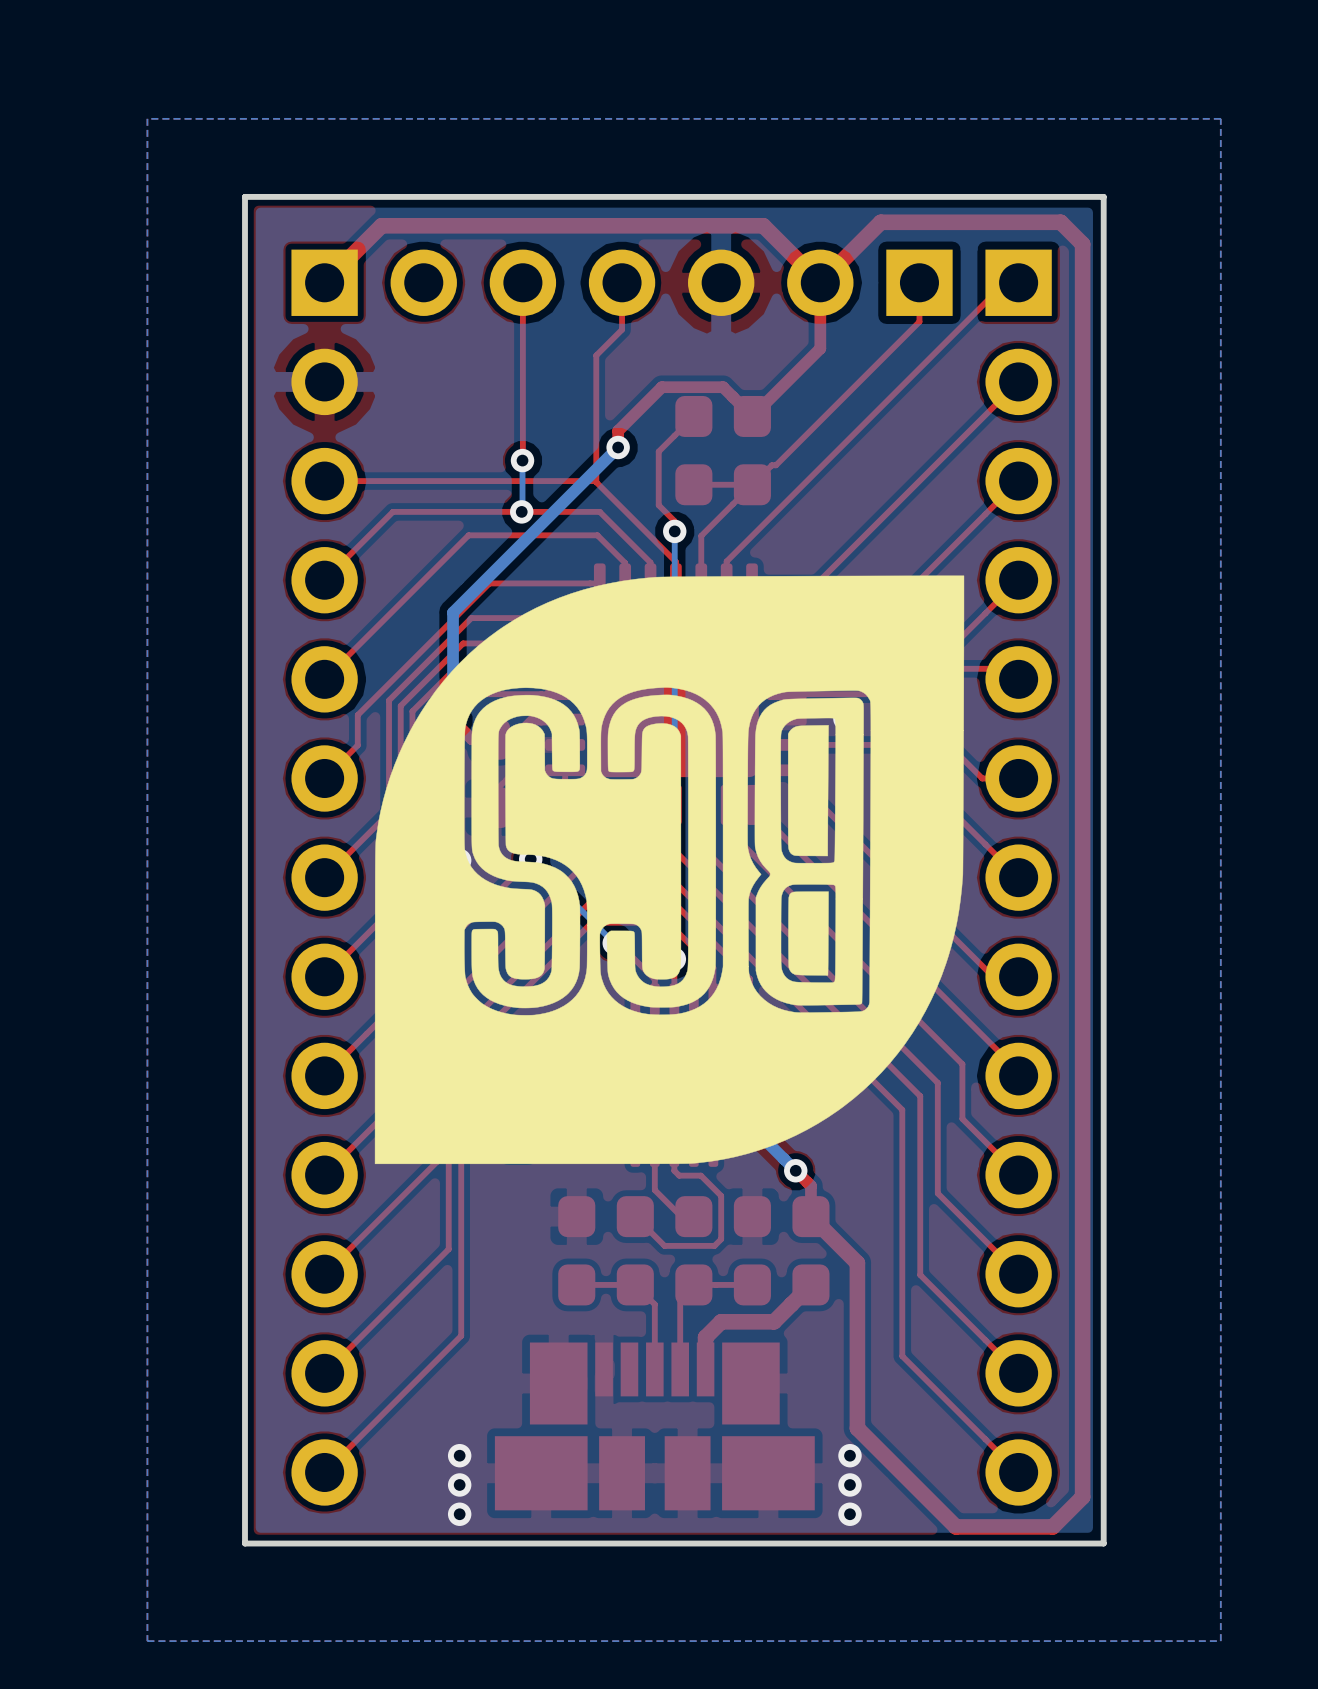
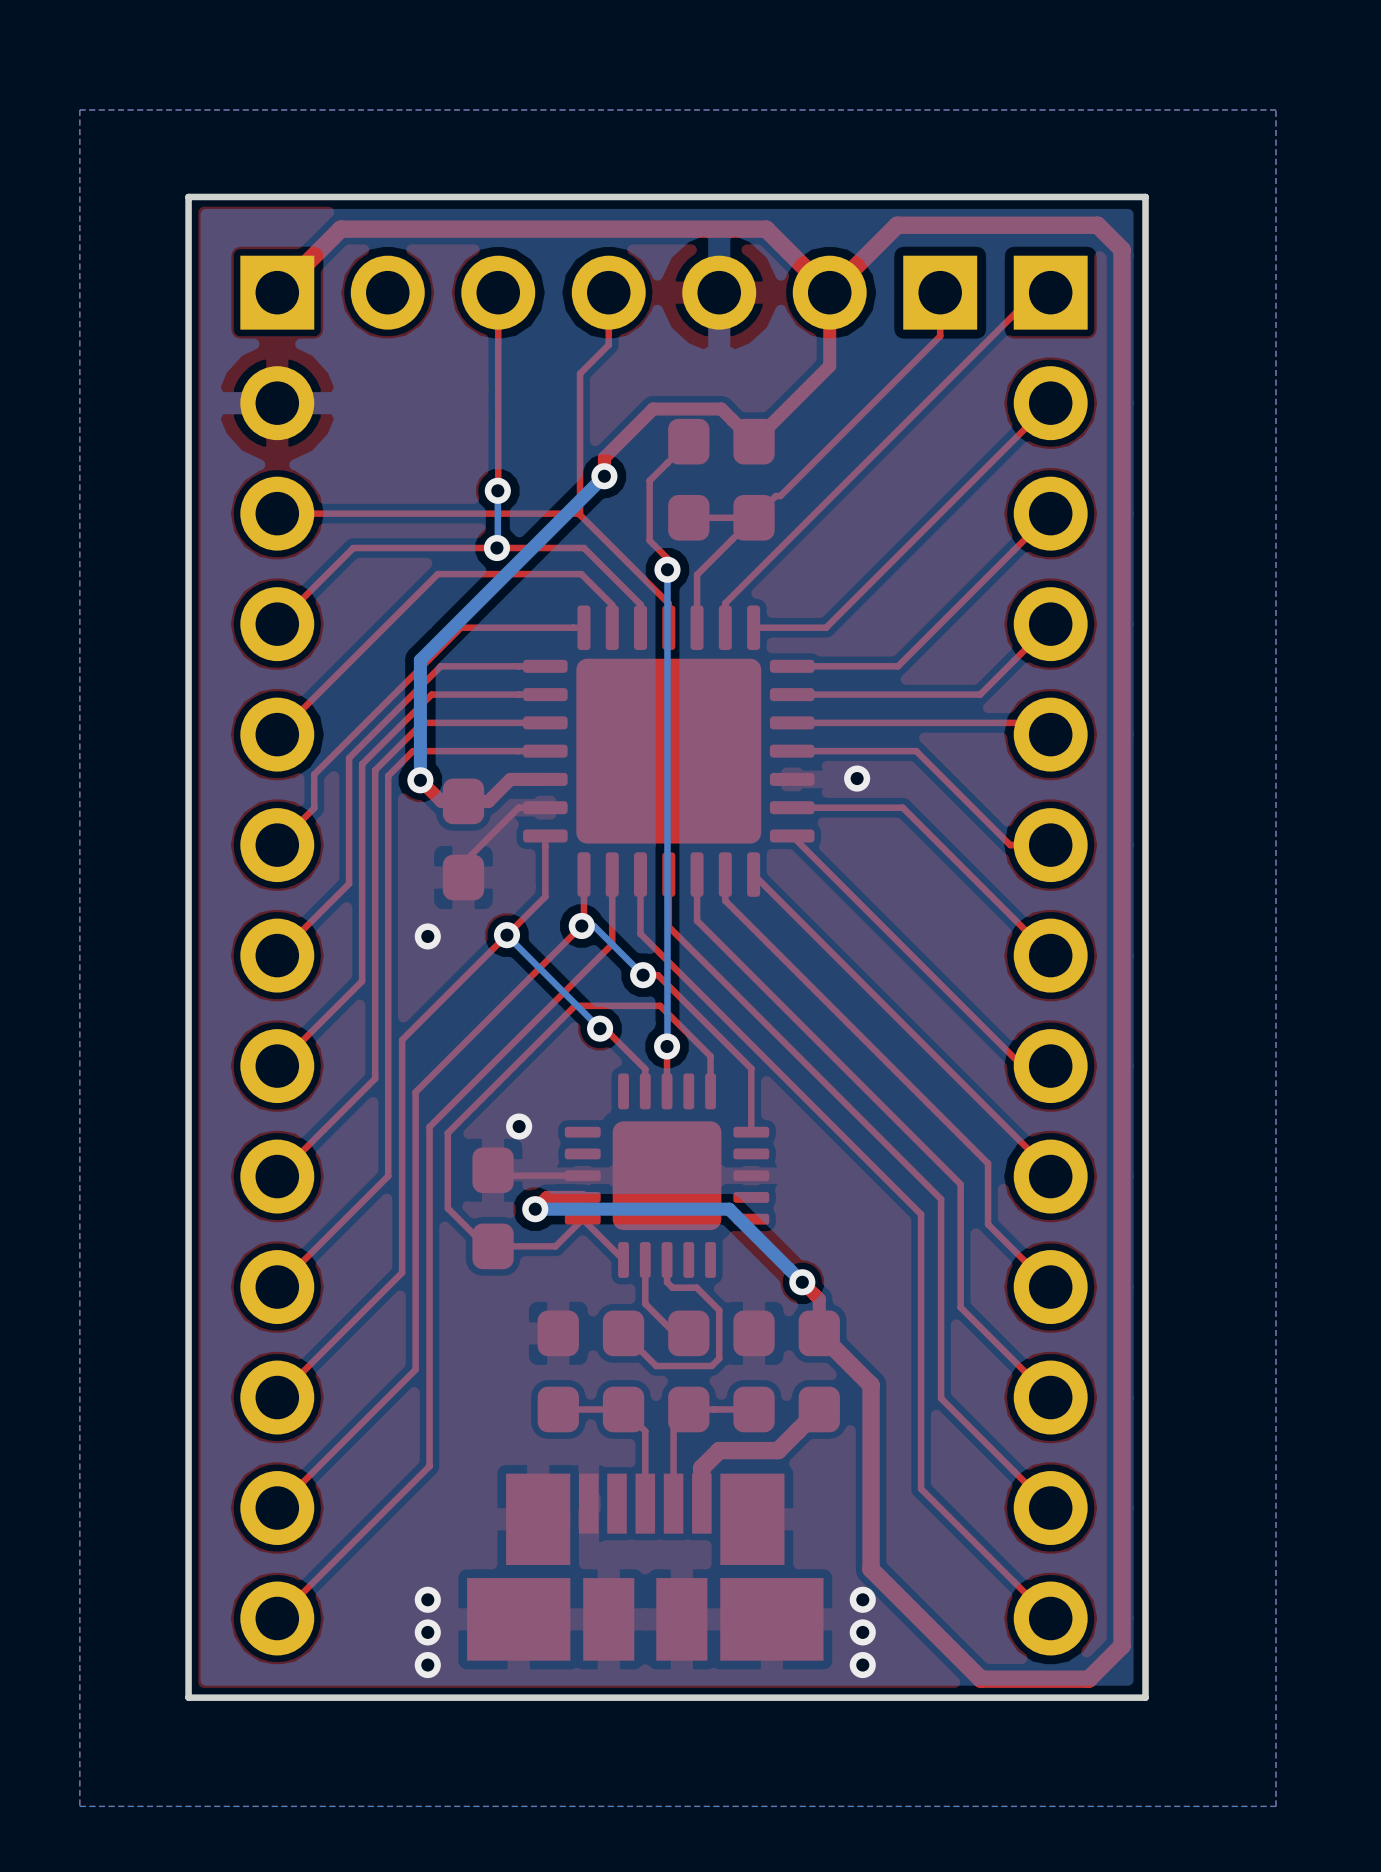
drawing: [374, 575, 965, 1165] -> none

